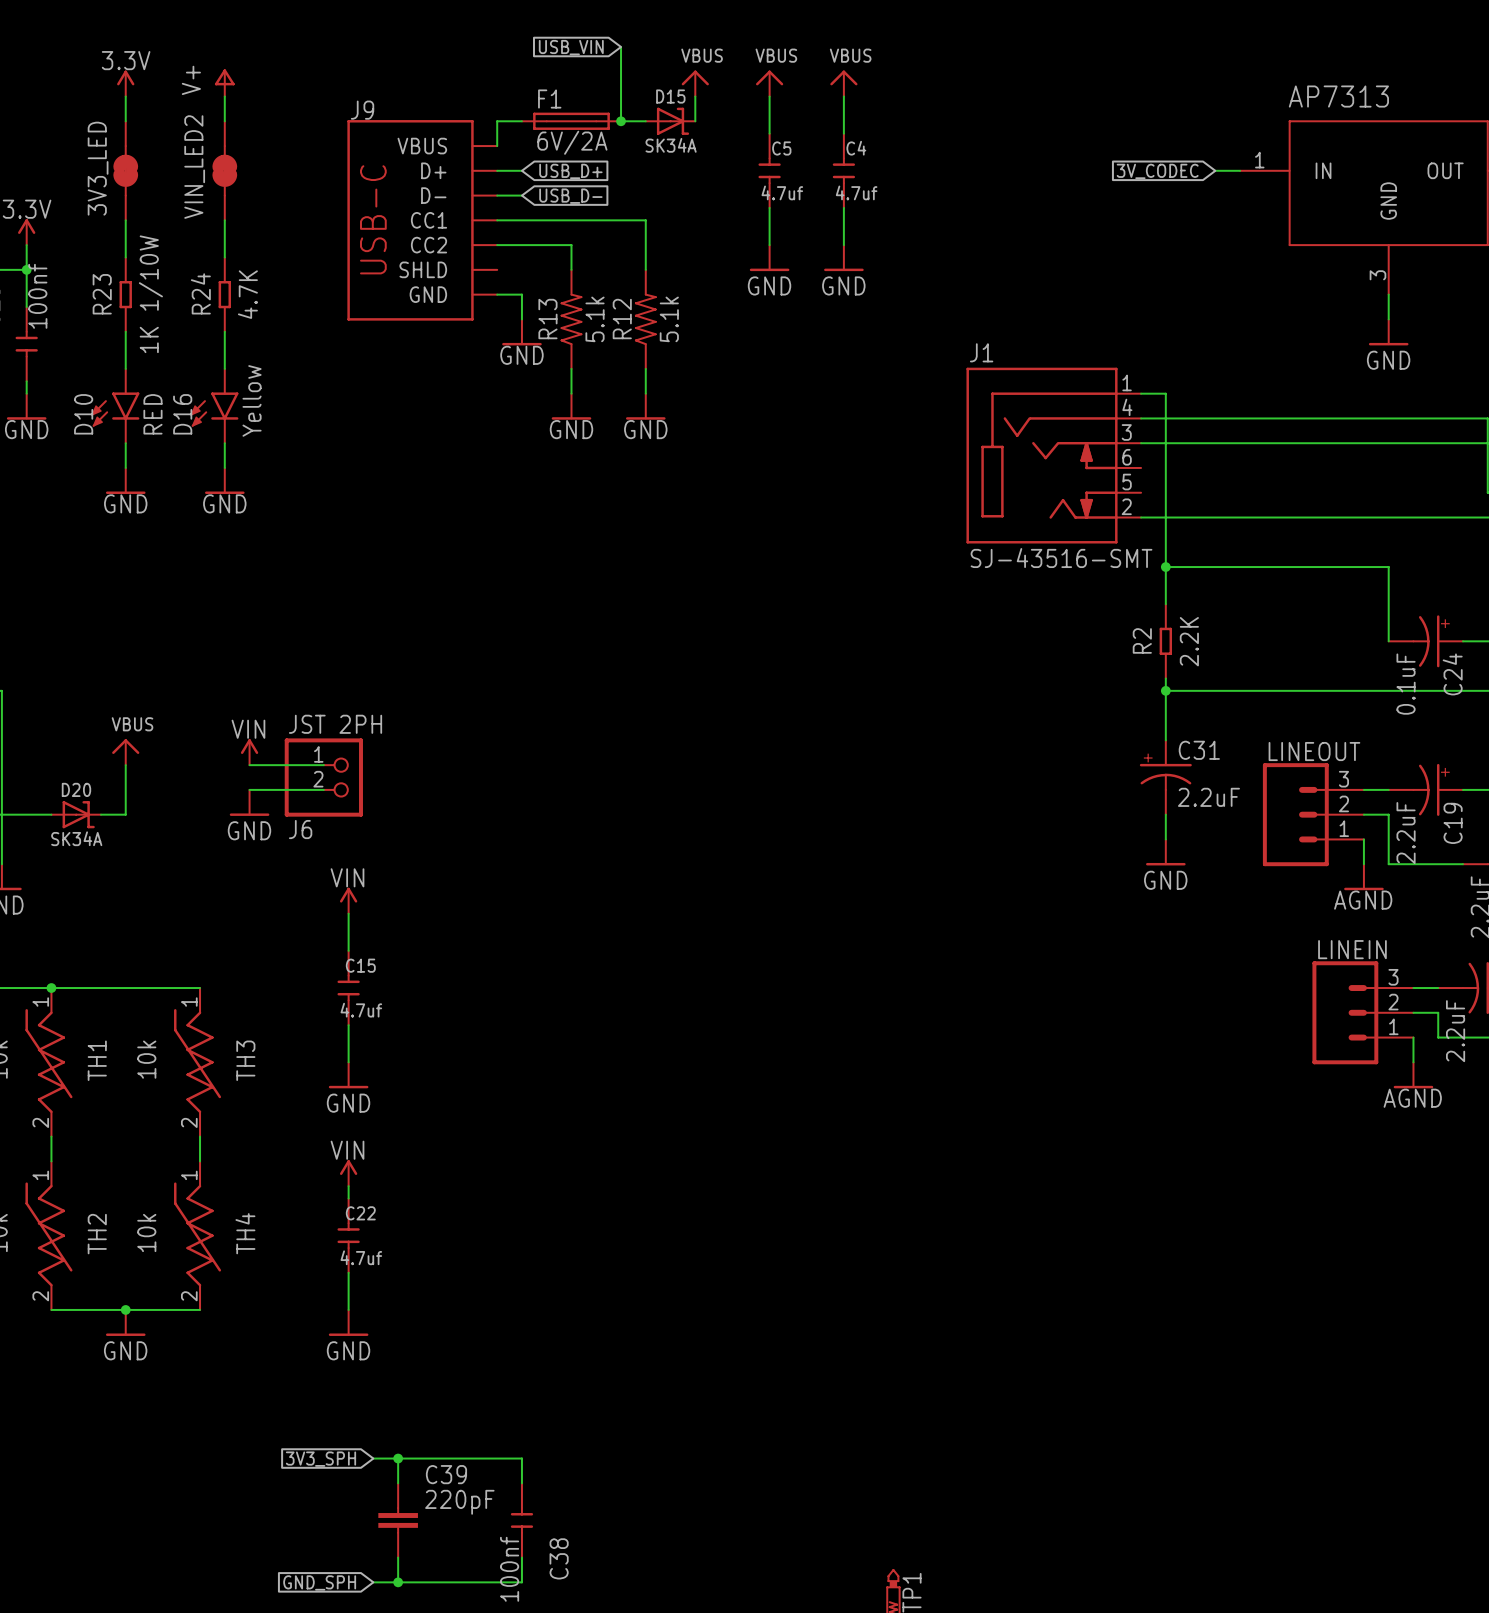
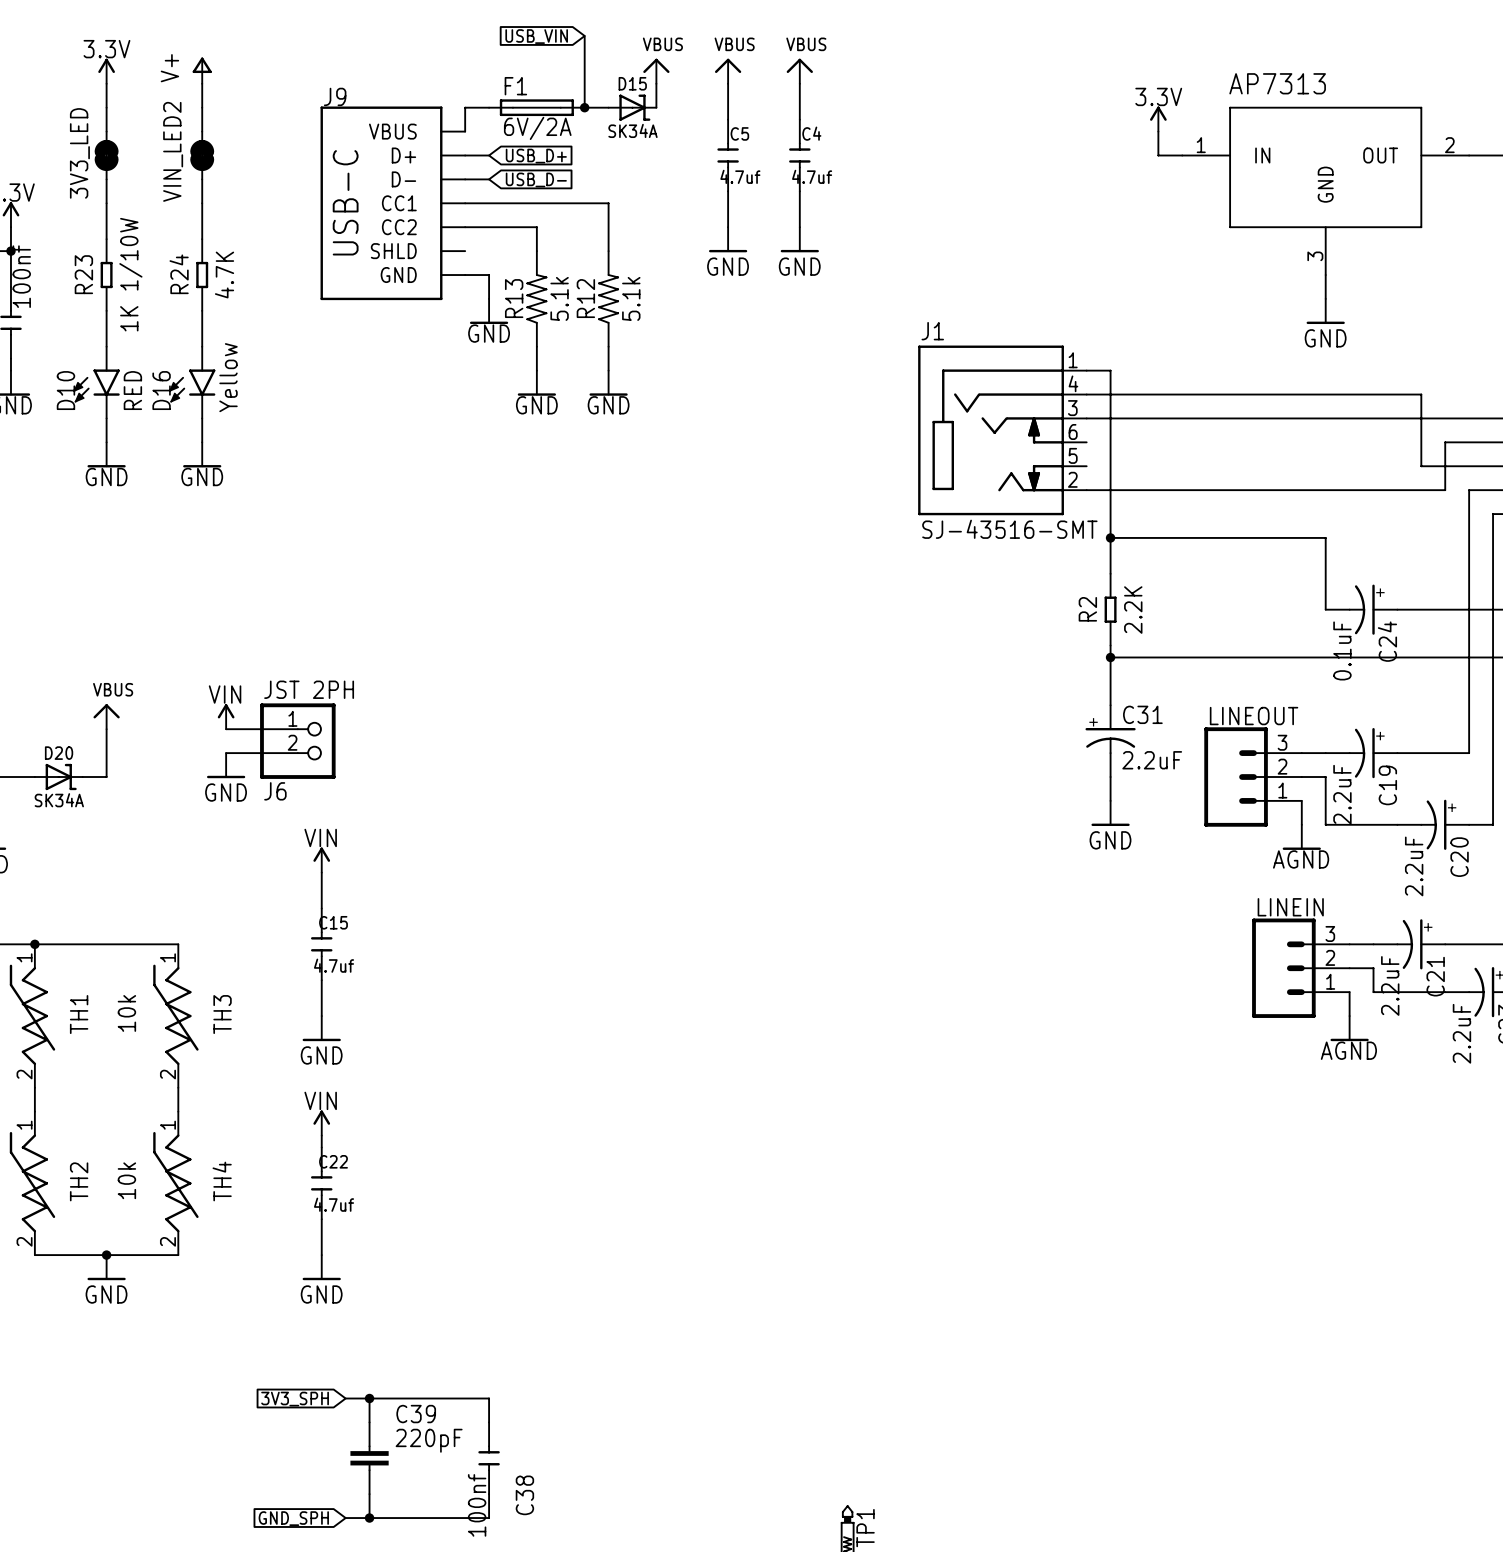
power symbol: none -> 3.3V (1158, 119)
wire: none -> (1158, 131) (1158, 155)
global label: 3V_CODEC (1157, 171) -> none

